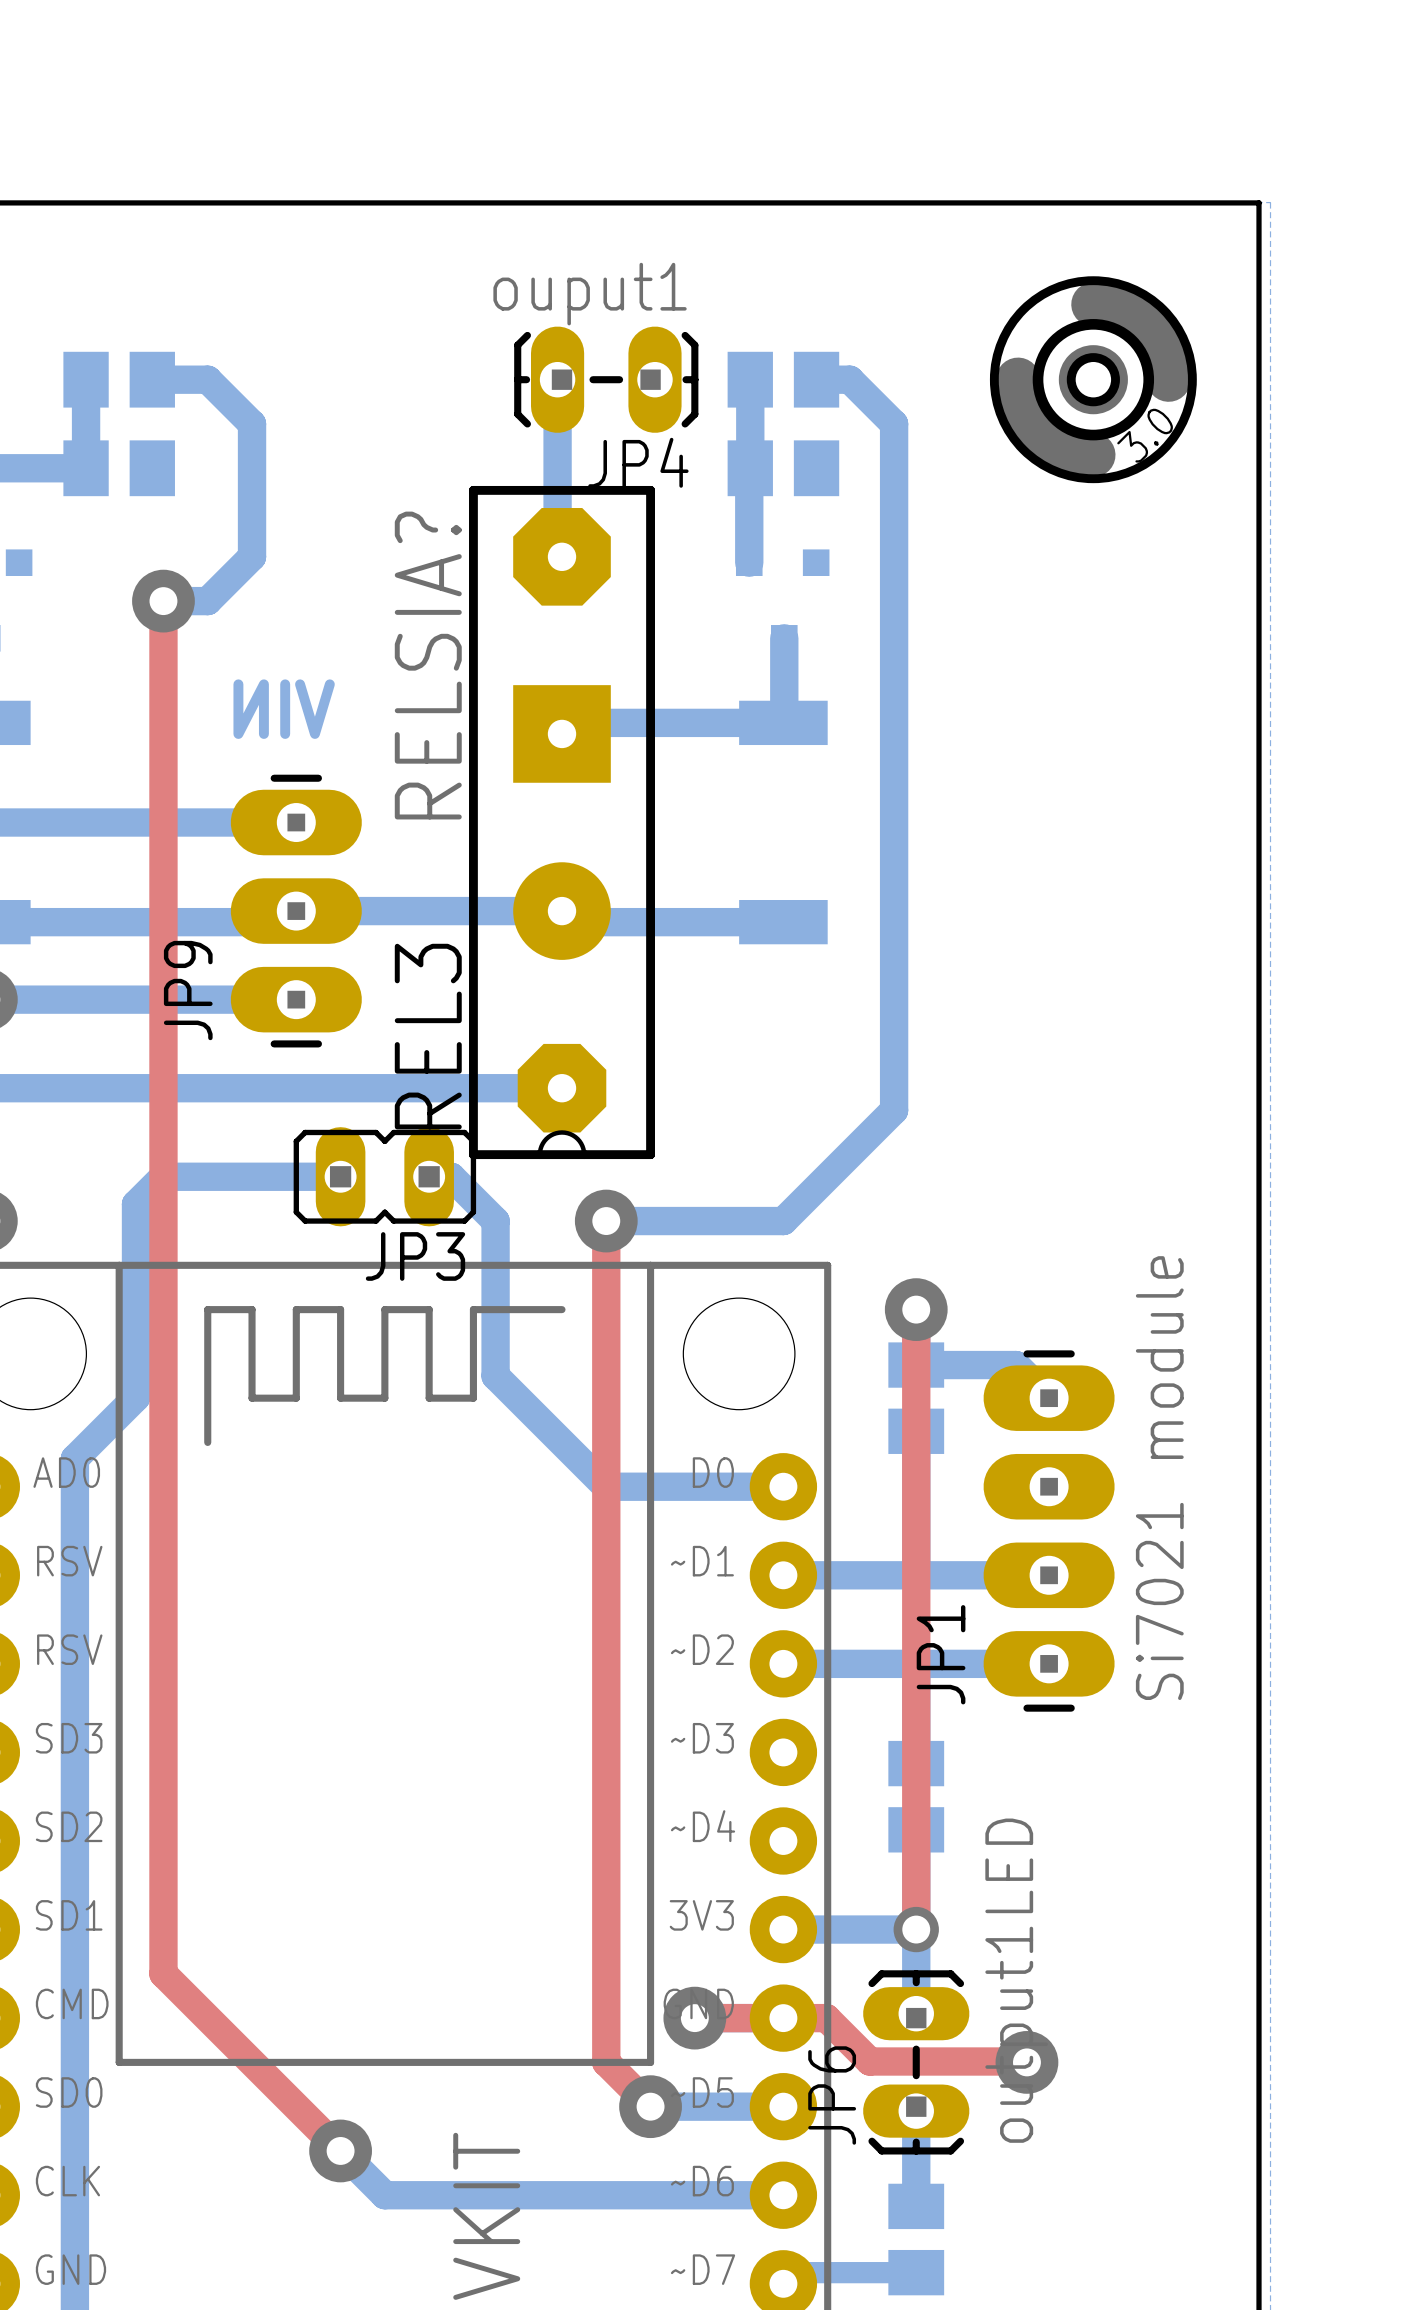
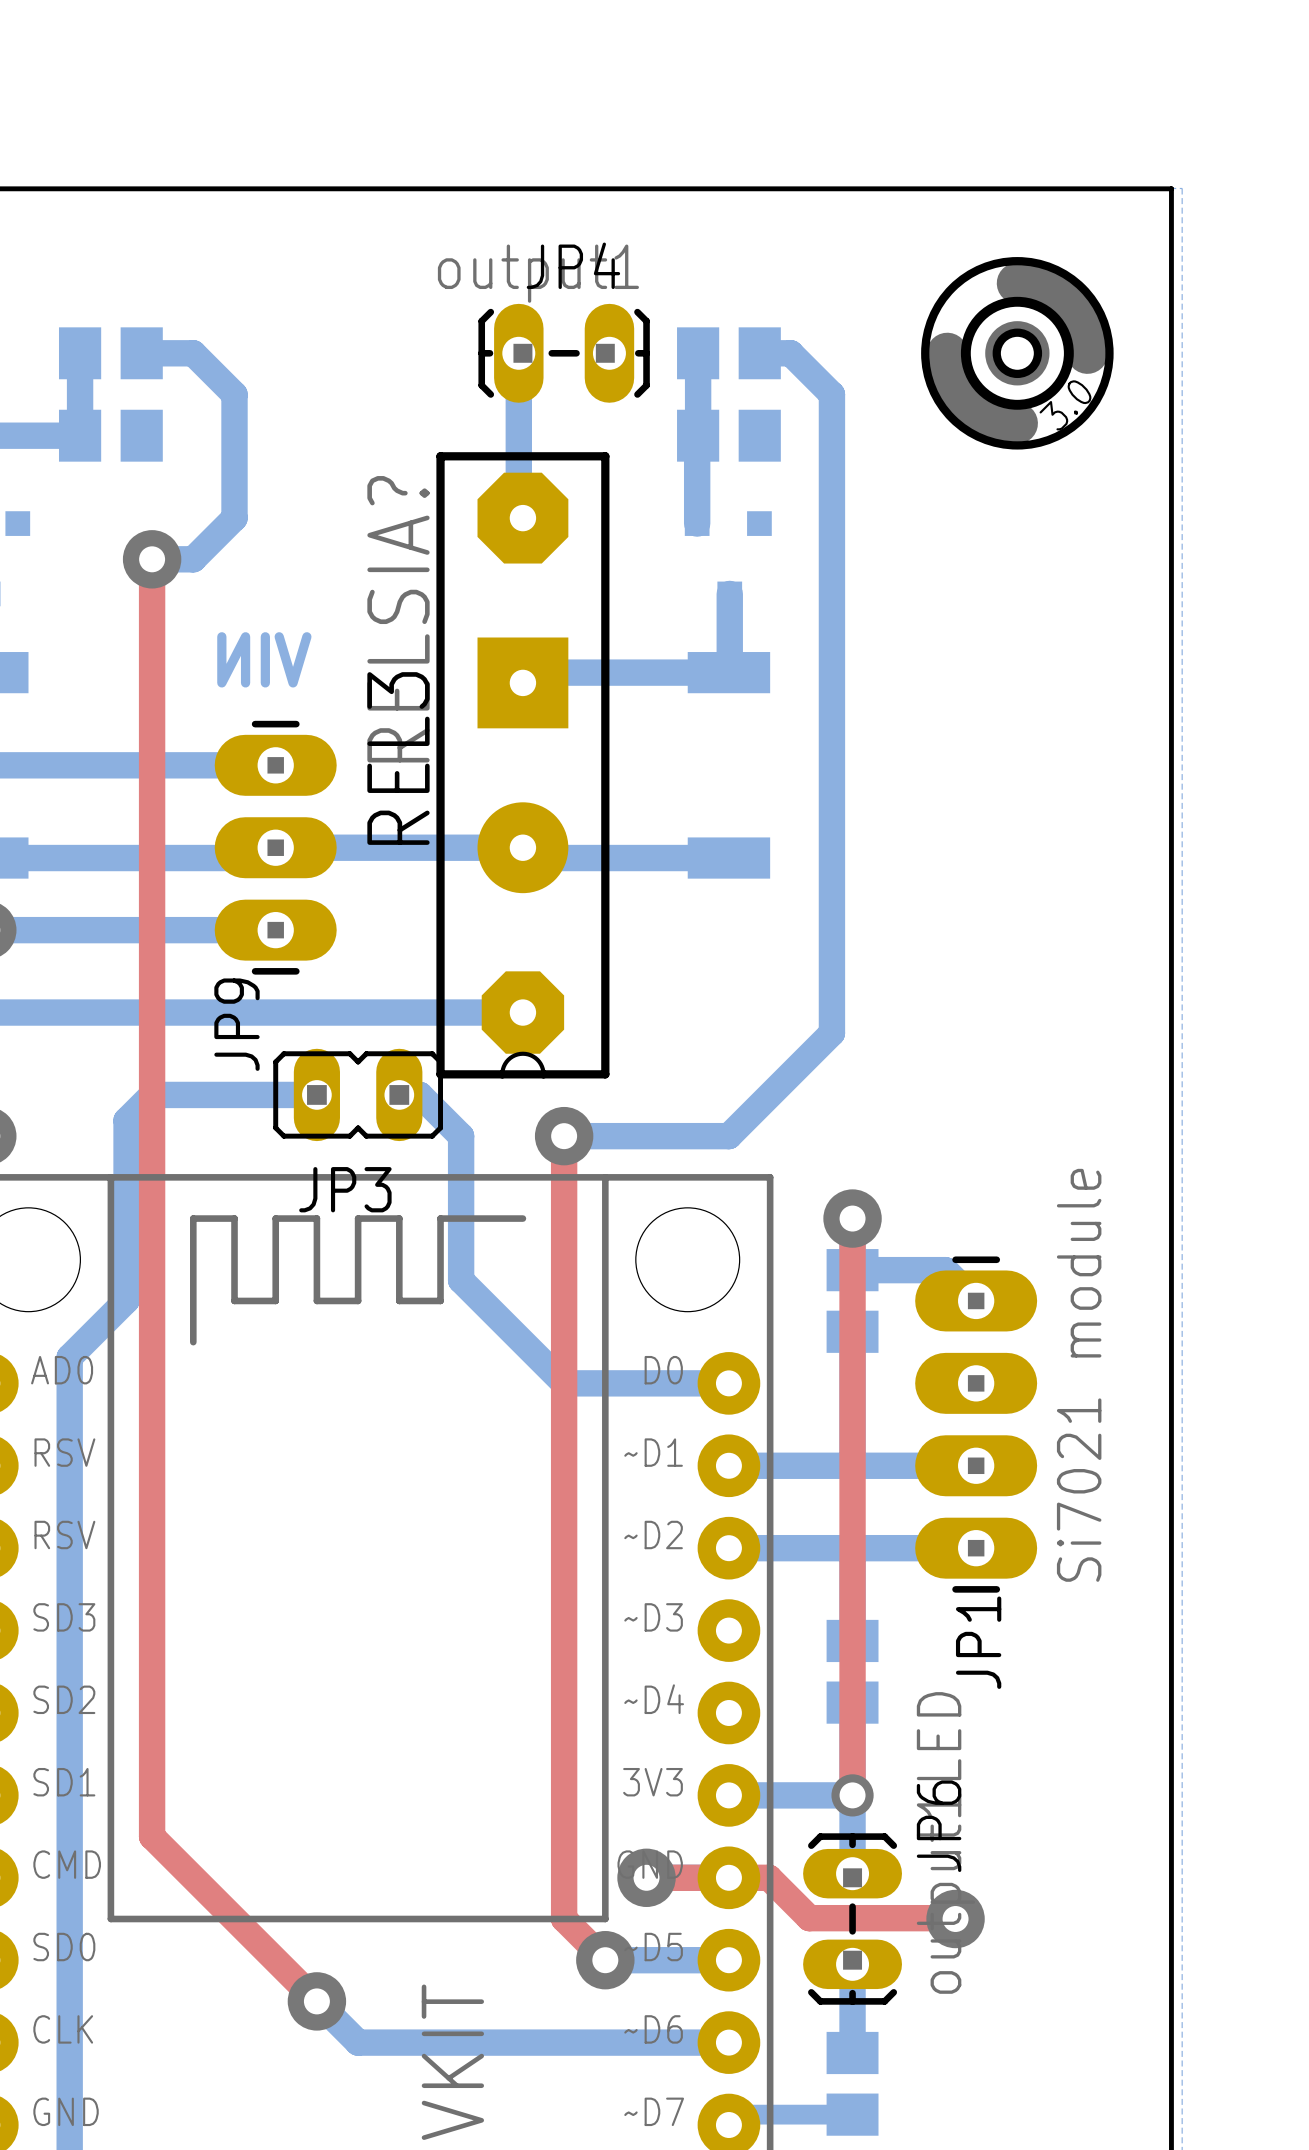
JP4 value: ouput1 (590, 294) -> output1 (538, 273)
JP4 name position: JP4 (638, 462) -> JP4 (573, 265)
JP9 name position: JP9 (188, 990) -> JP9 (236, 1024)
REL3 name position: REL3 (428, 1036) -> REL3 (398, 758)
JP3 name position: JP3 (415, 1256) -> JP3 (345, 1189)
JP1 name position: JP1 (941, 1654) -> JP1 (978, 1642)
JP6 name position: JP6 (832, 2095) -> JP6 (939, 1826)

